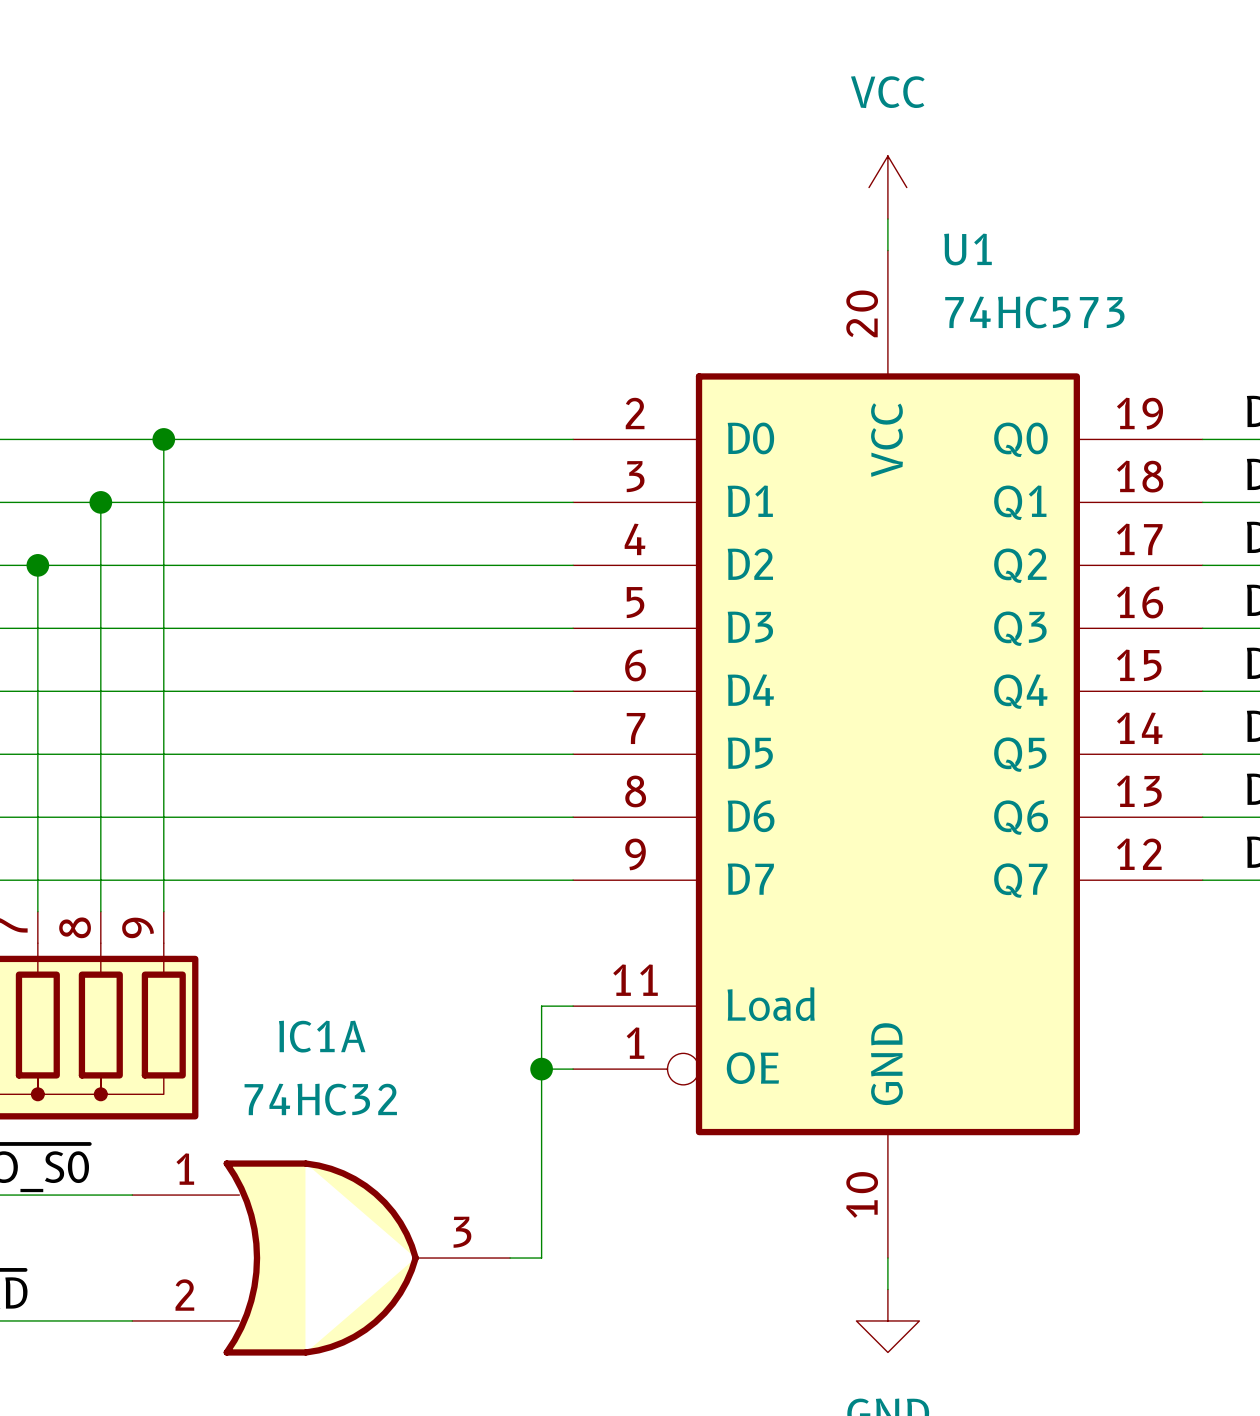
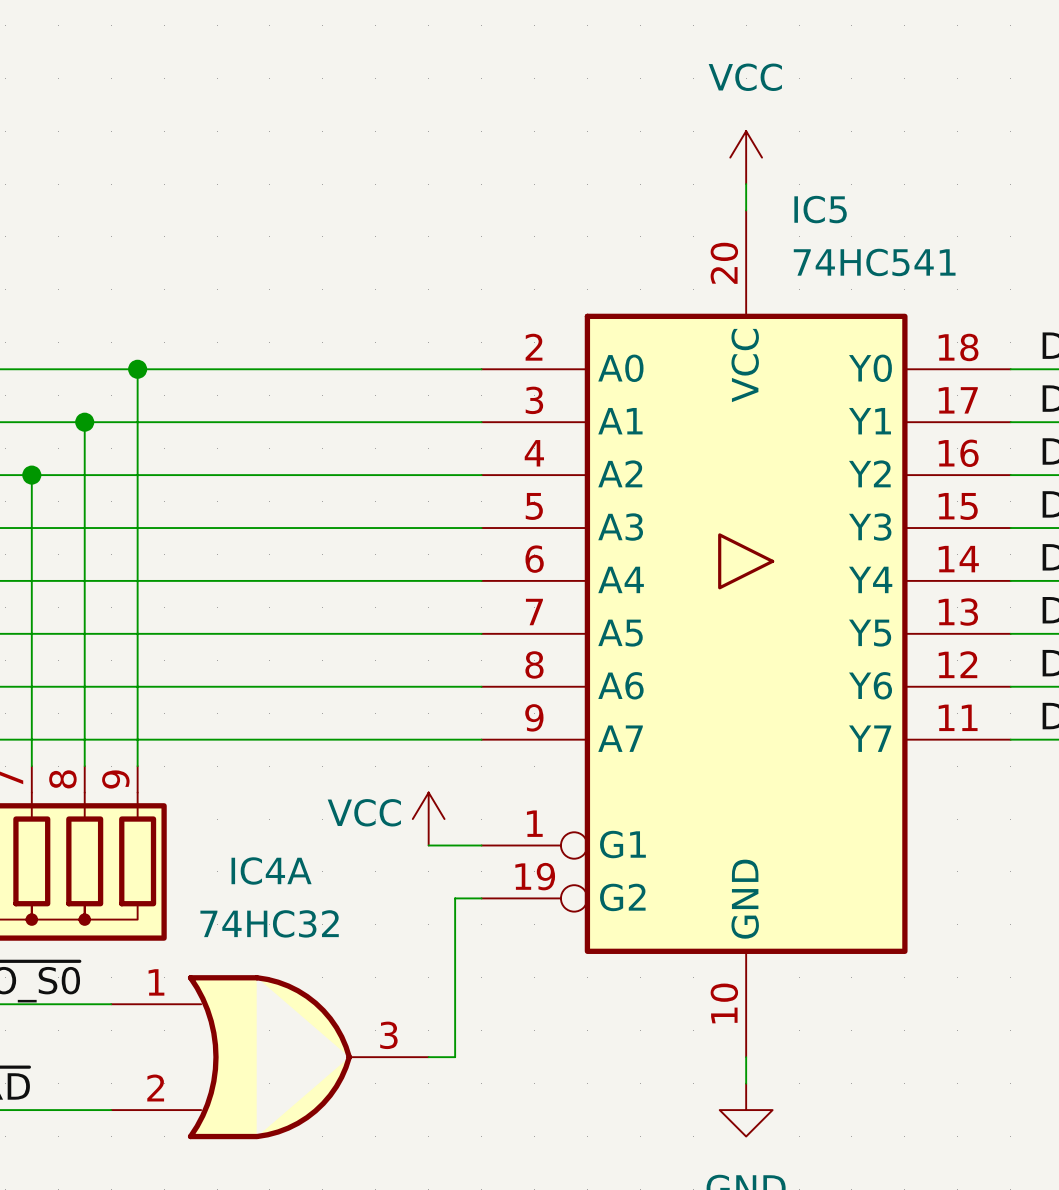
U1: 74HC573 (887, 754) -> none
IC5: none -> 74HC541 (746, 633)
power symbol: none -> VCC (428, 819)
wire: (541, 1006) (541, 1069) -> (455, 845) (428, 845)
IC1A name: IC1A (322, 1036) -> IC4A (271, 870)
junction: (541, 1069) -> none

